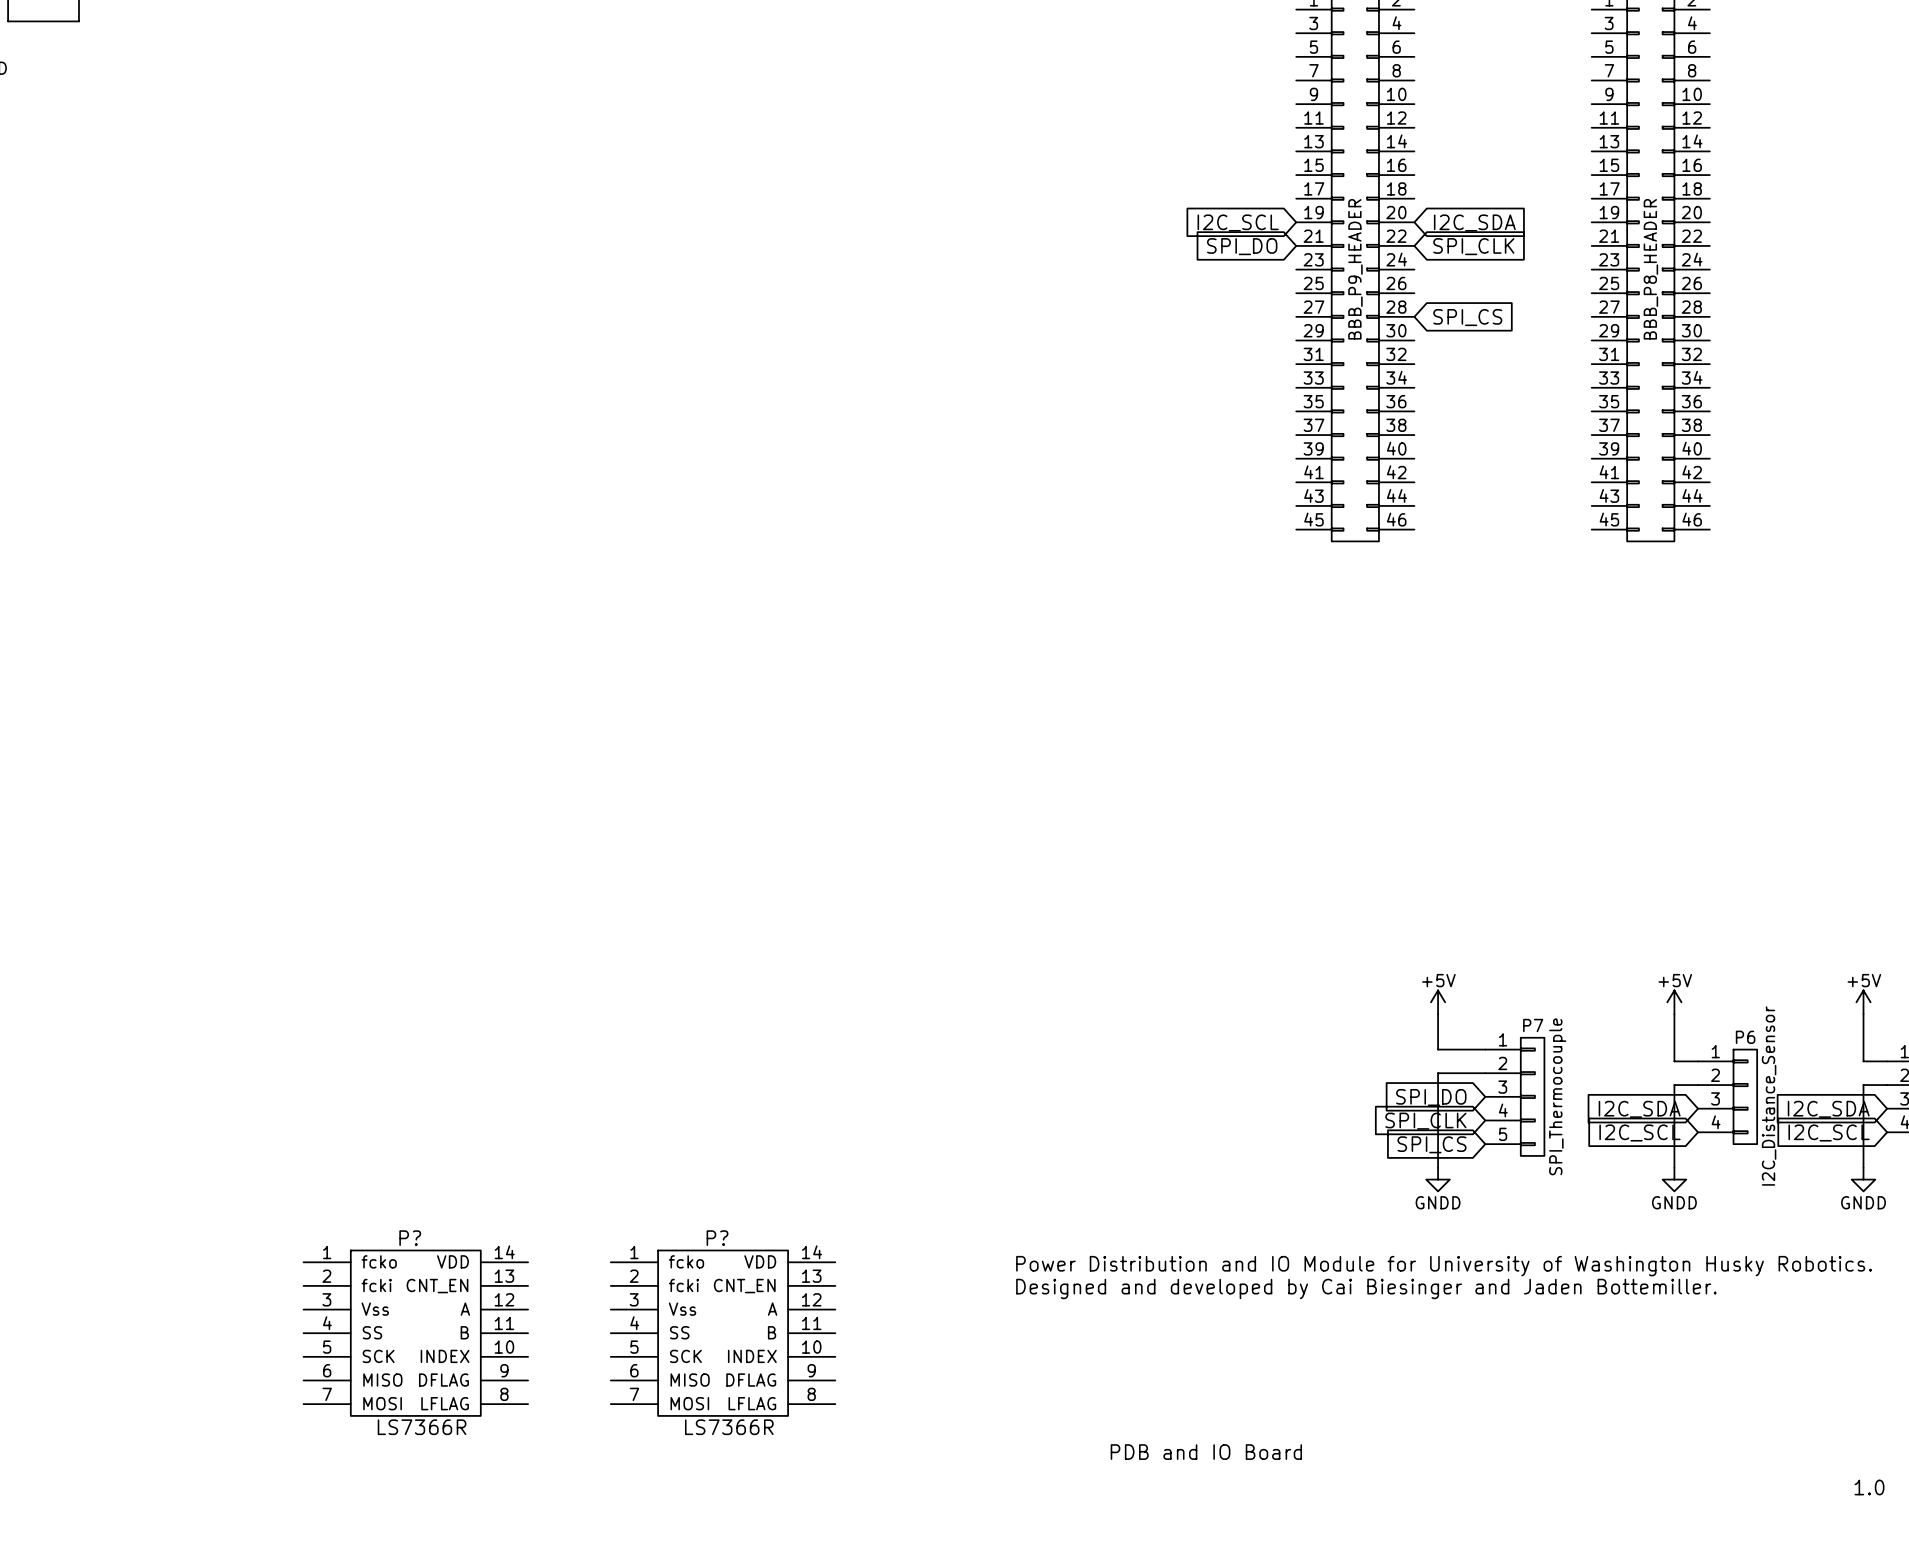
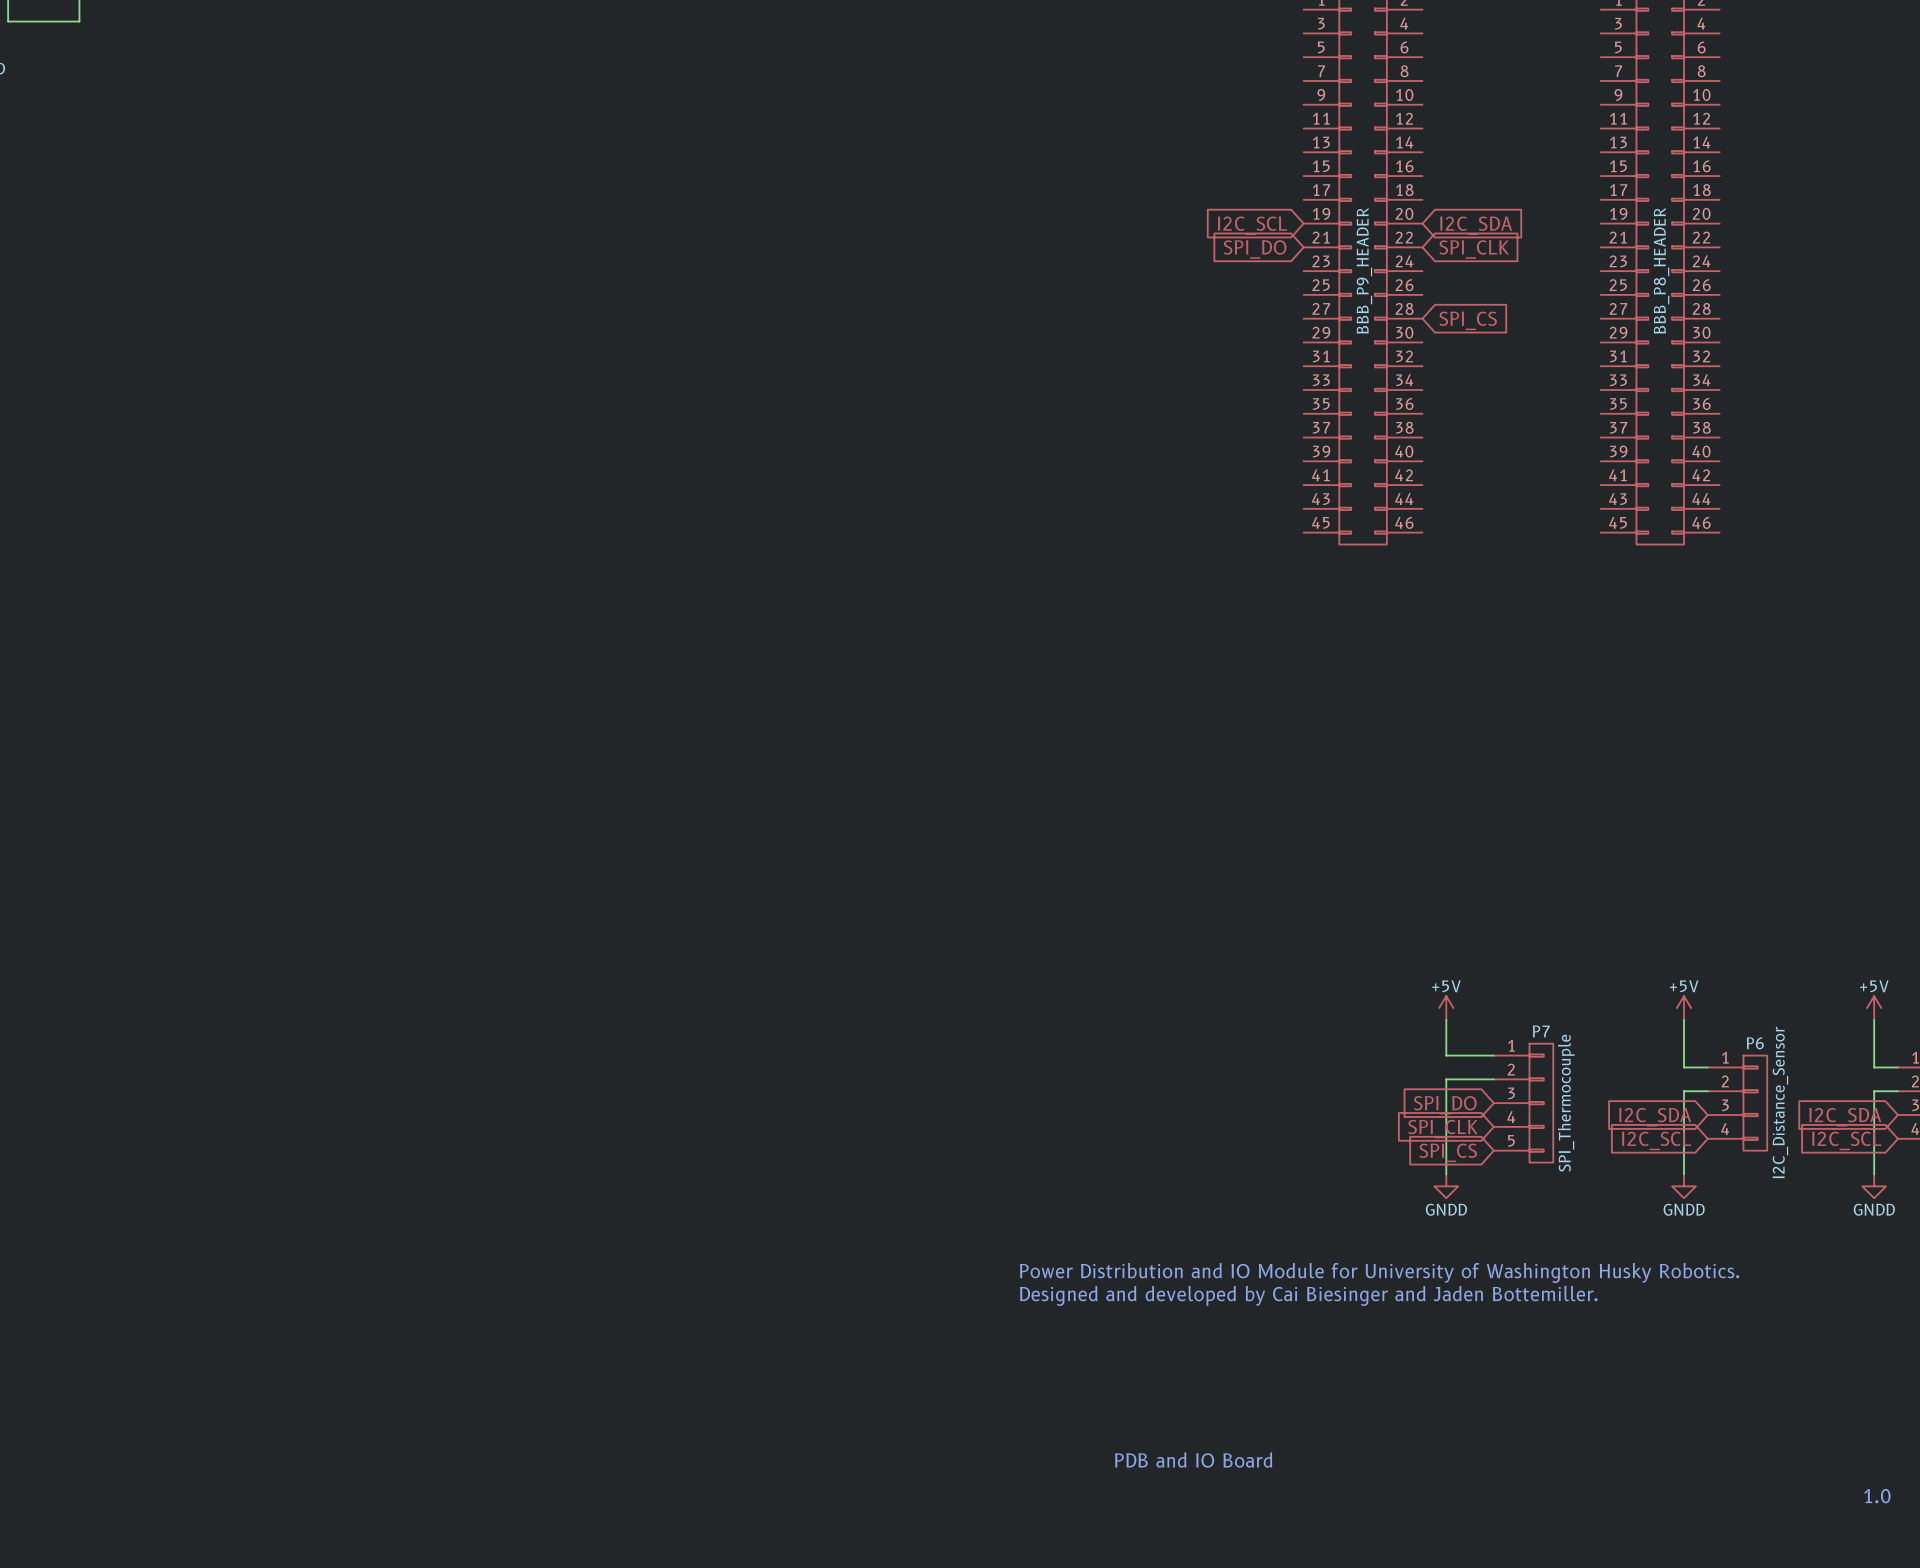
P?: LS7366R (415, 1333) -> none
P?: LS7366R (723, 1333) -> none

